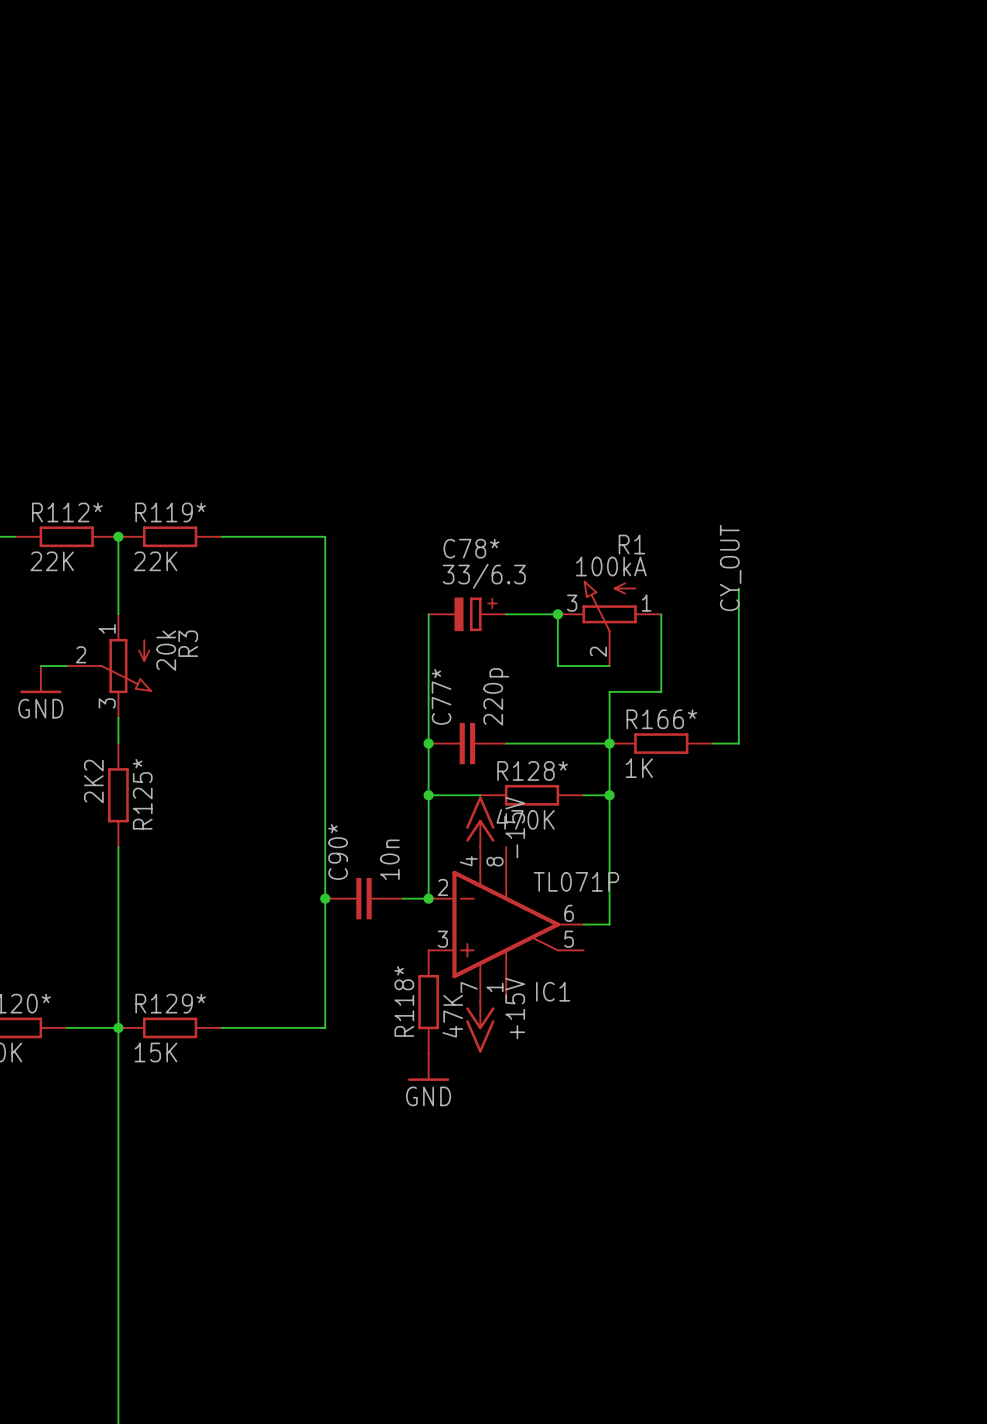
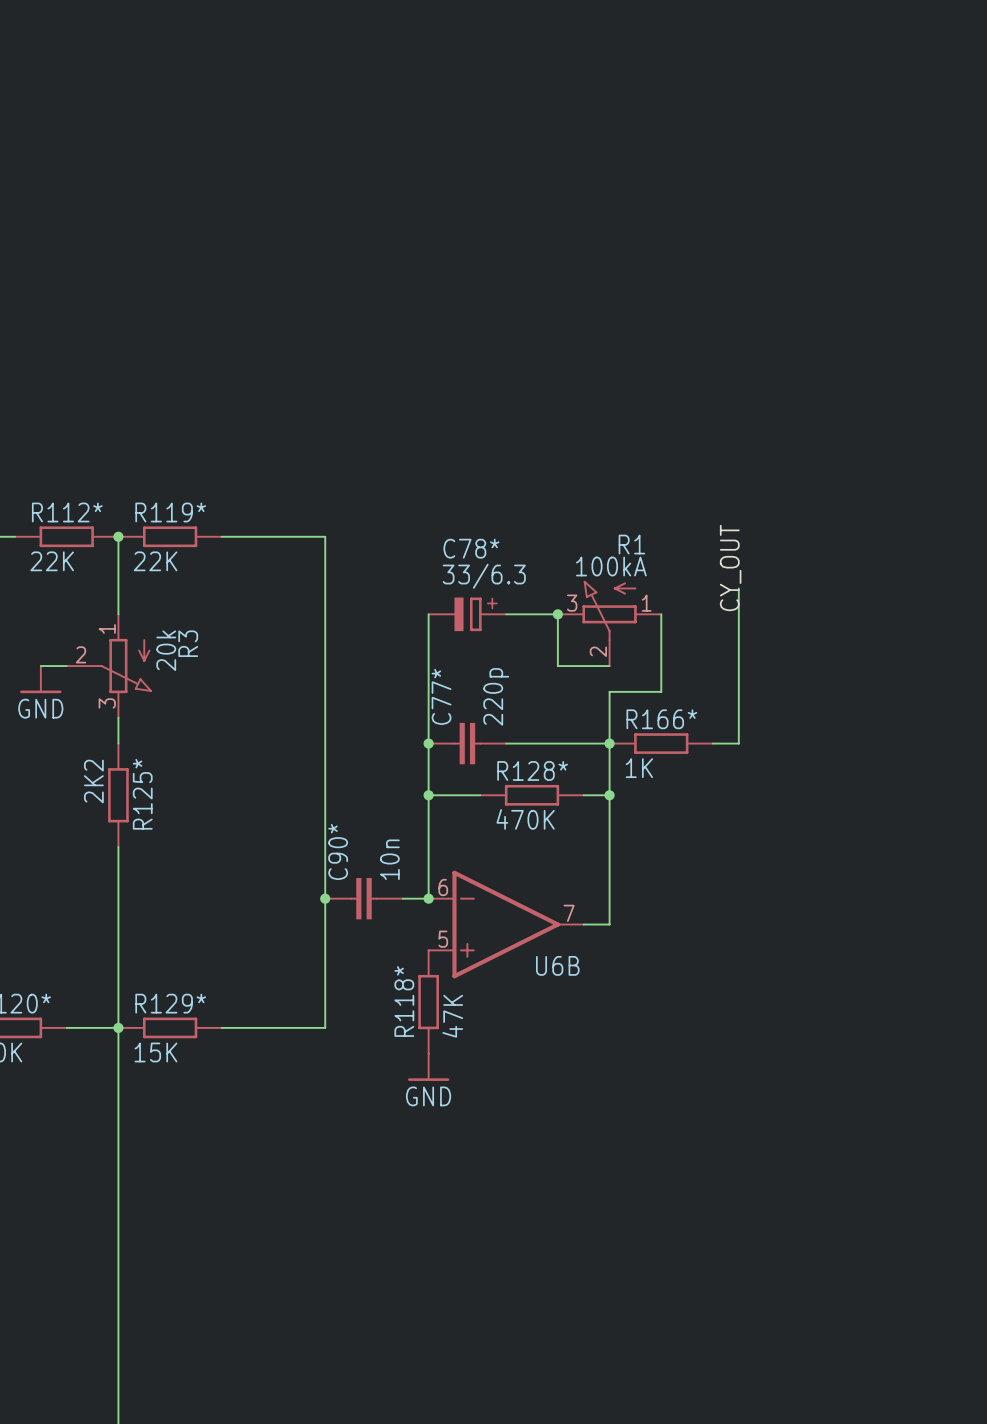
power symbol: -15V (480, 821) -> none
IC1: TL071P (506, 924) -> none
U6B: none -> (506, 924)
power symbol: +15V (480, 1027) -> none

